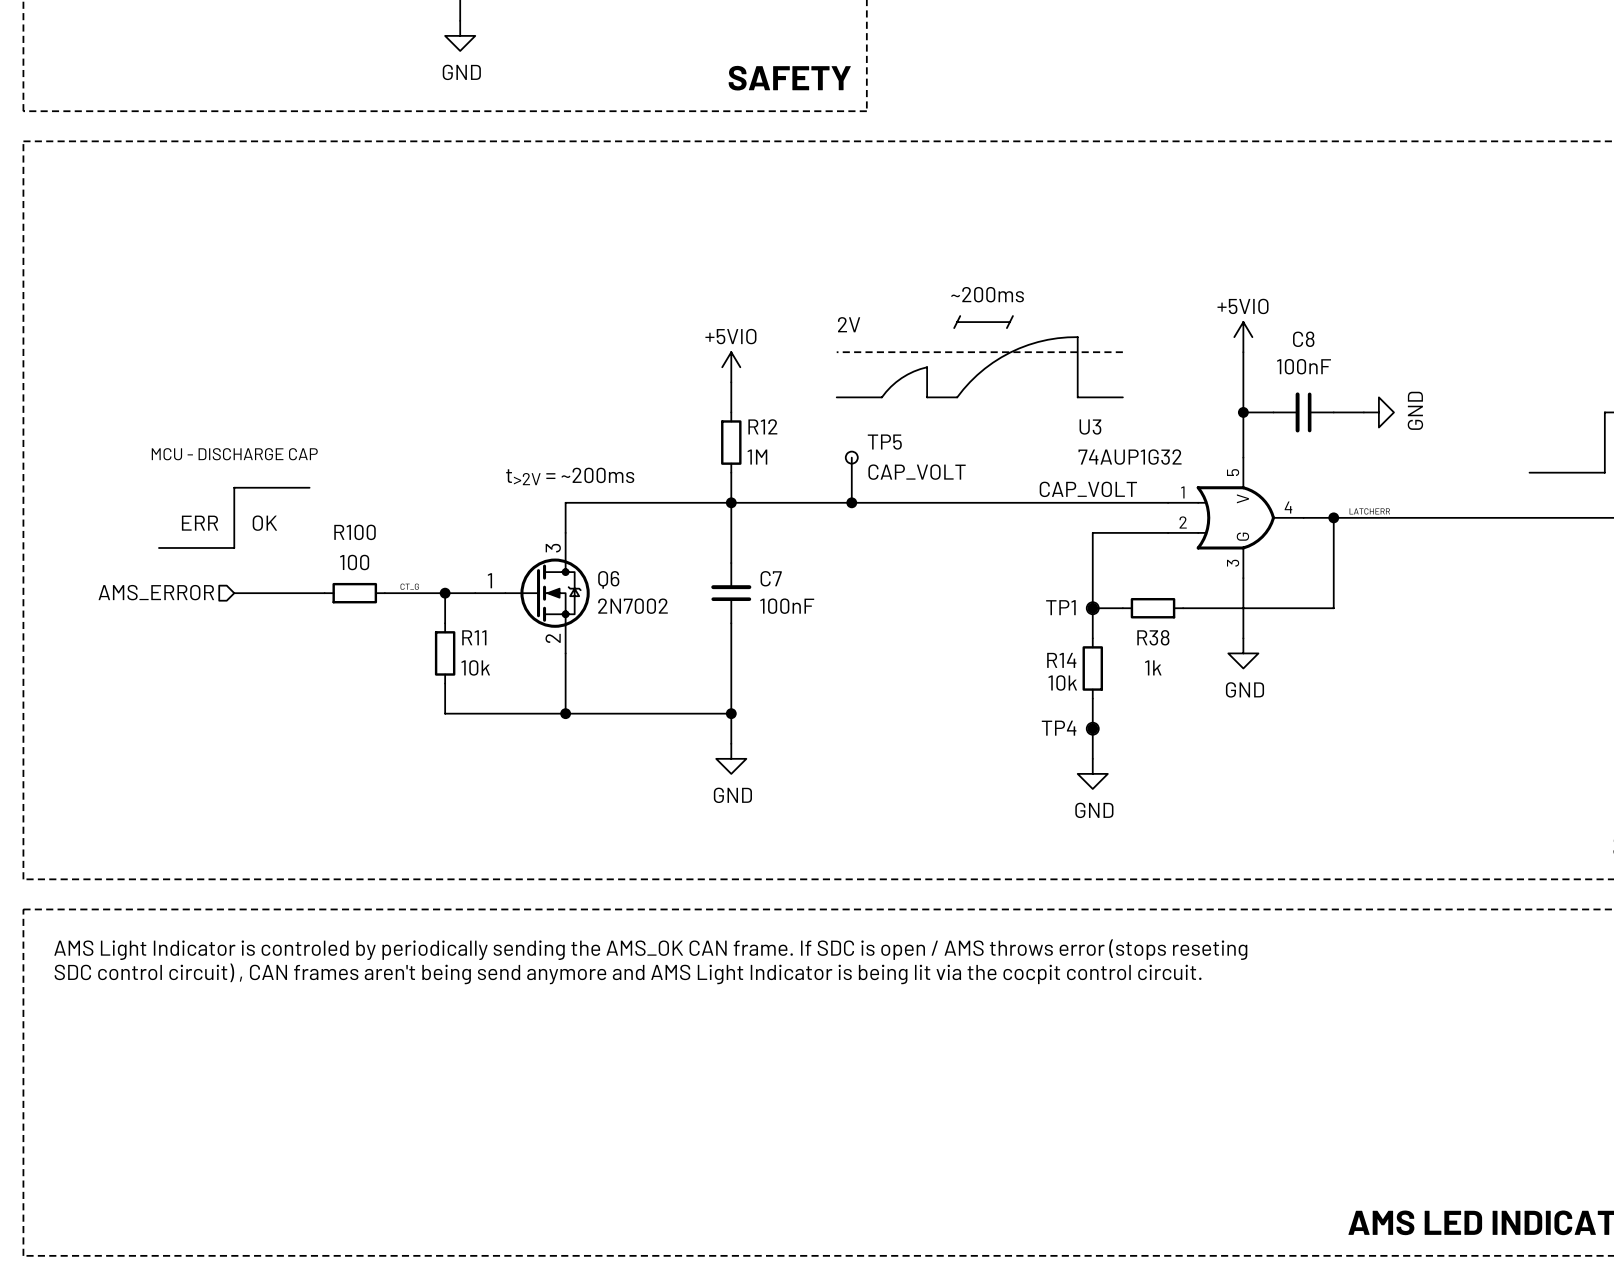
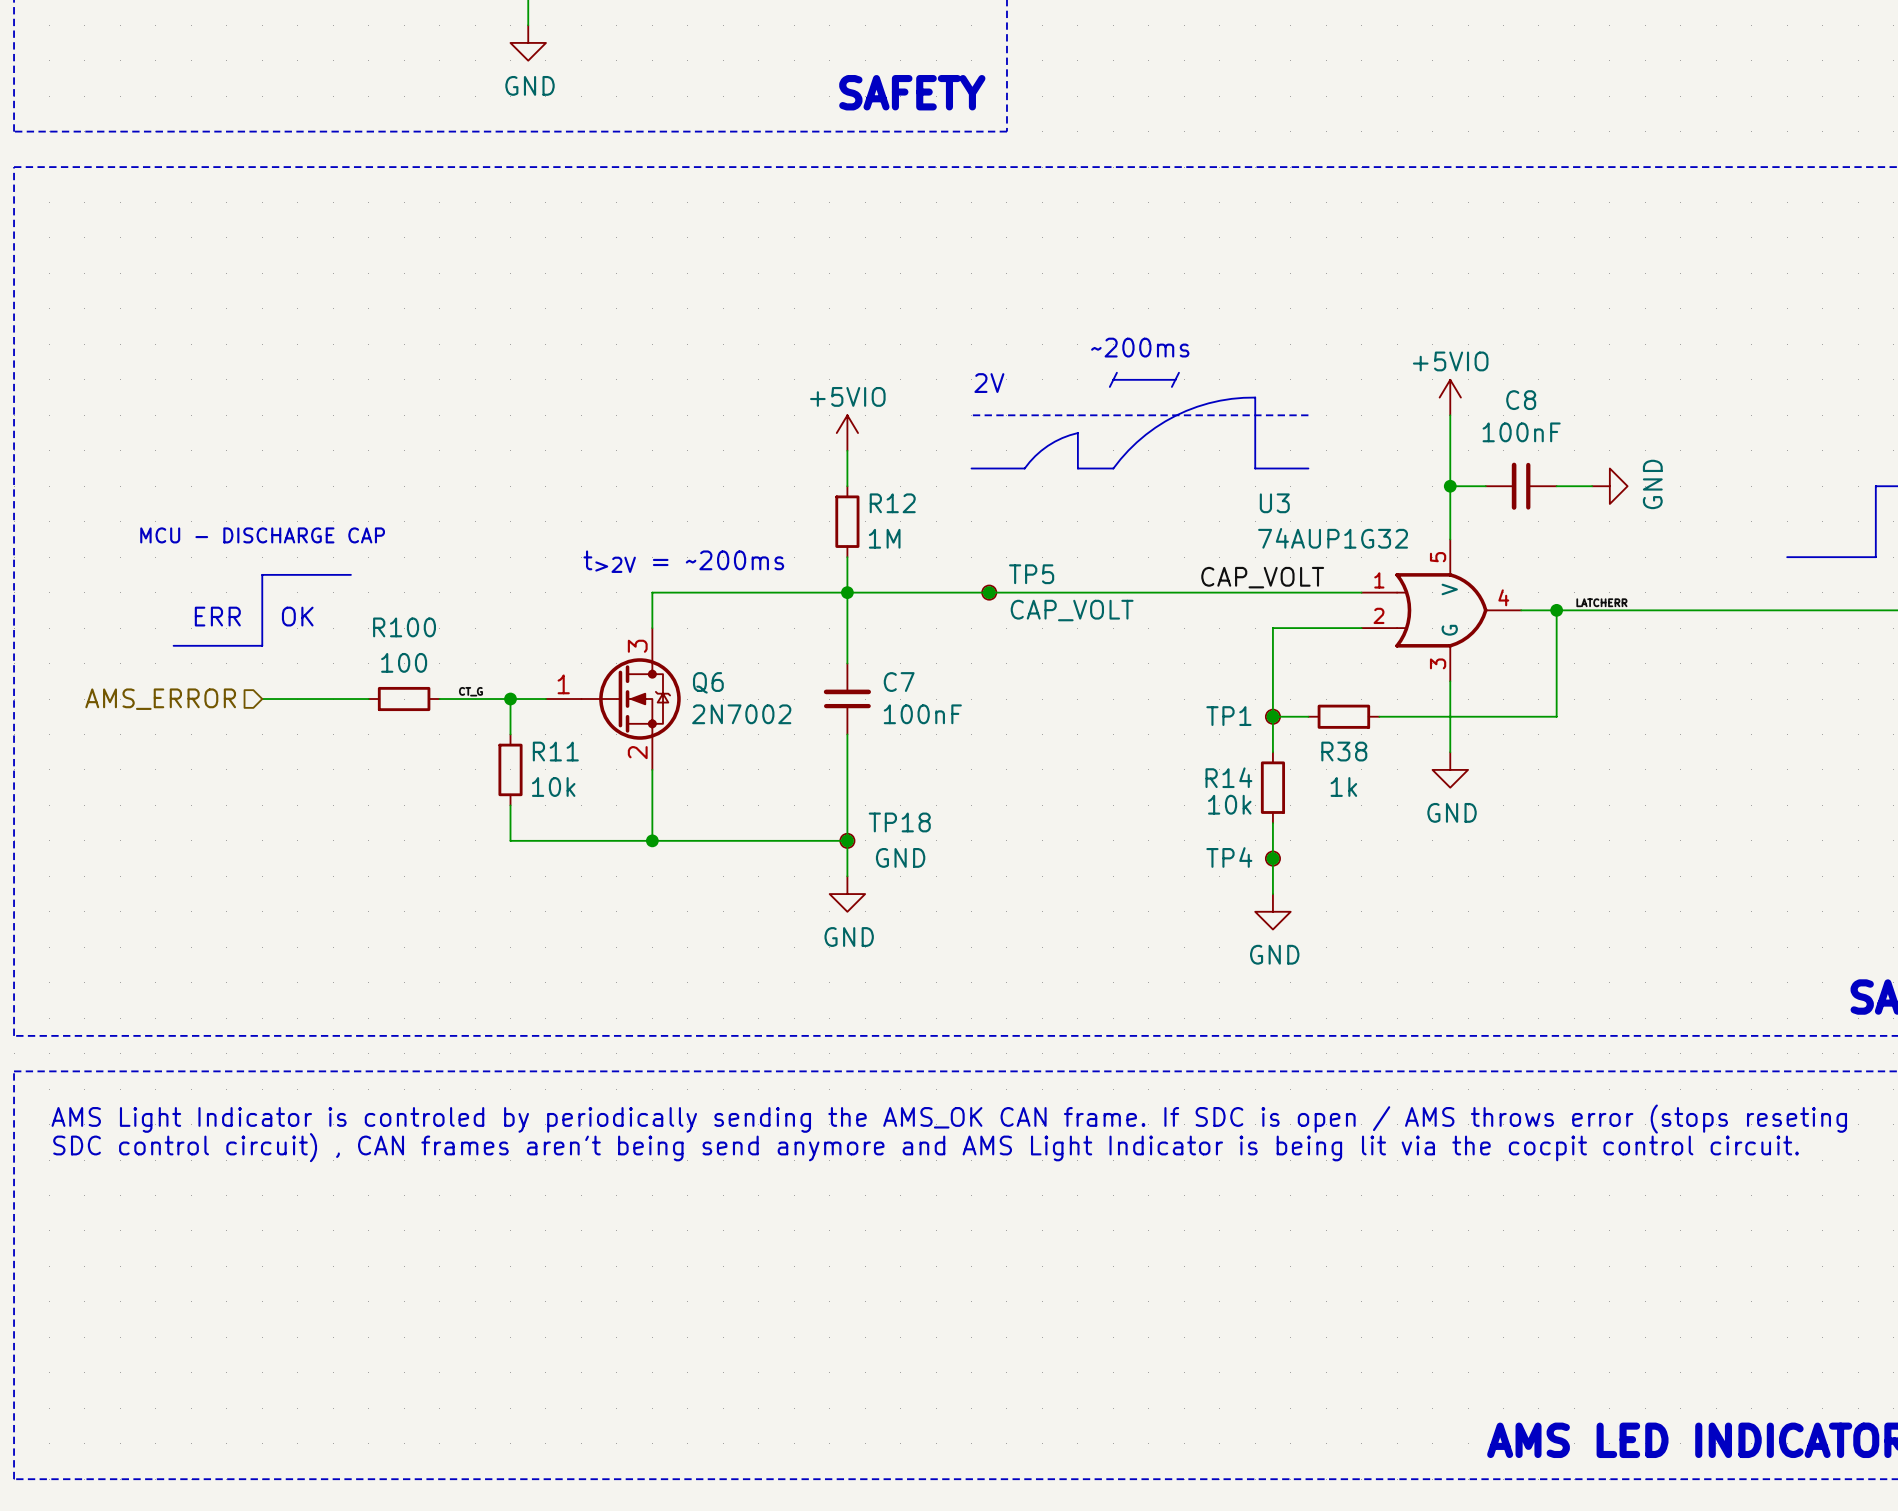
wire: (851, 457) (851, 502) -> none
TP5 position: (851, 457) -> (989, 592)
TP18: none -> GND (847, 840)

